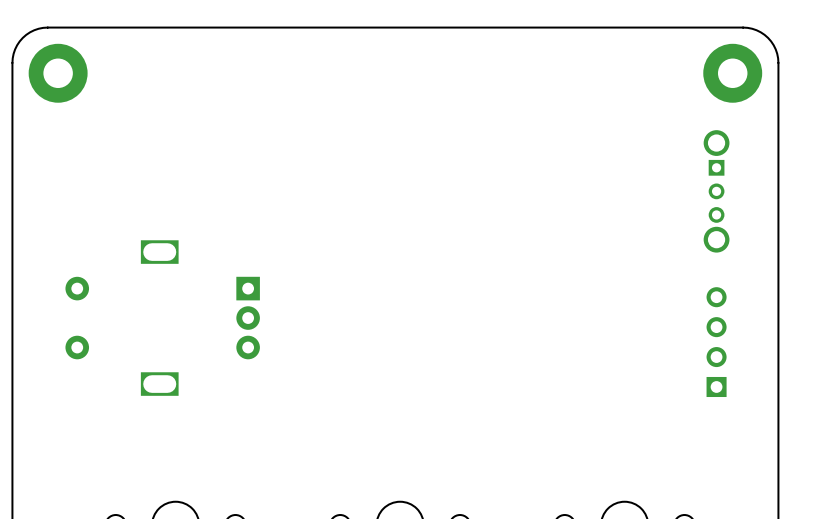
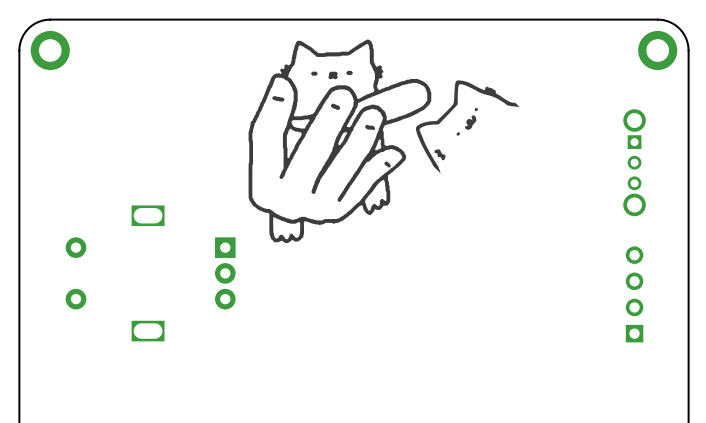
drawing: none -> [248, 39, 520, 244]
part: none -> (50, 50)
part: none -> (657, 50)
part: (58, 73) -> none
part: (732, 73) -> none

